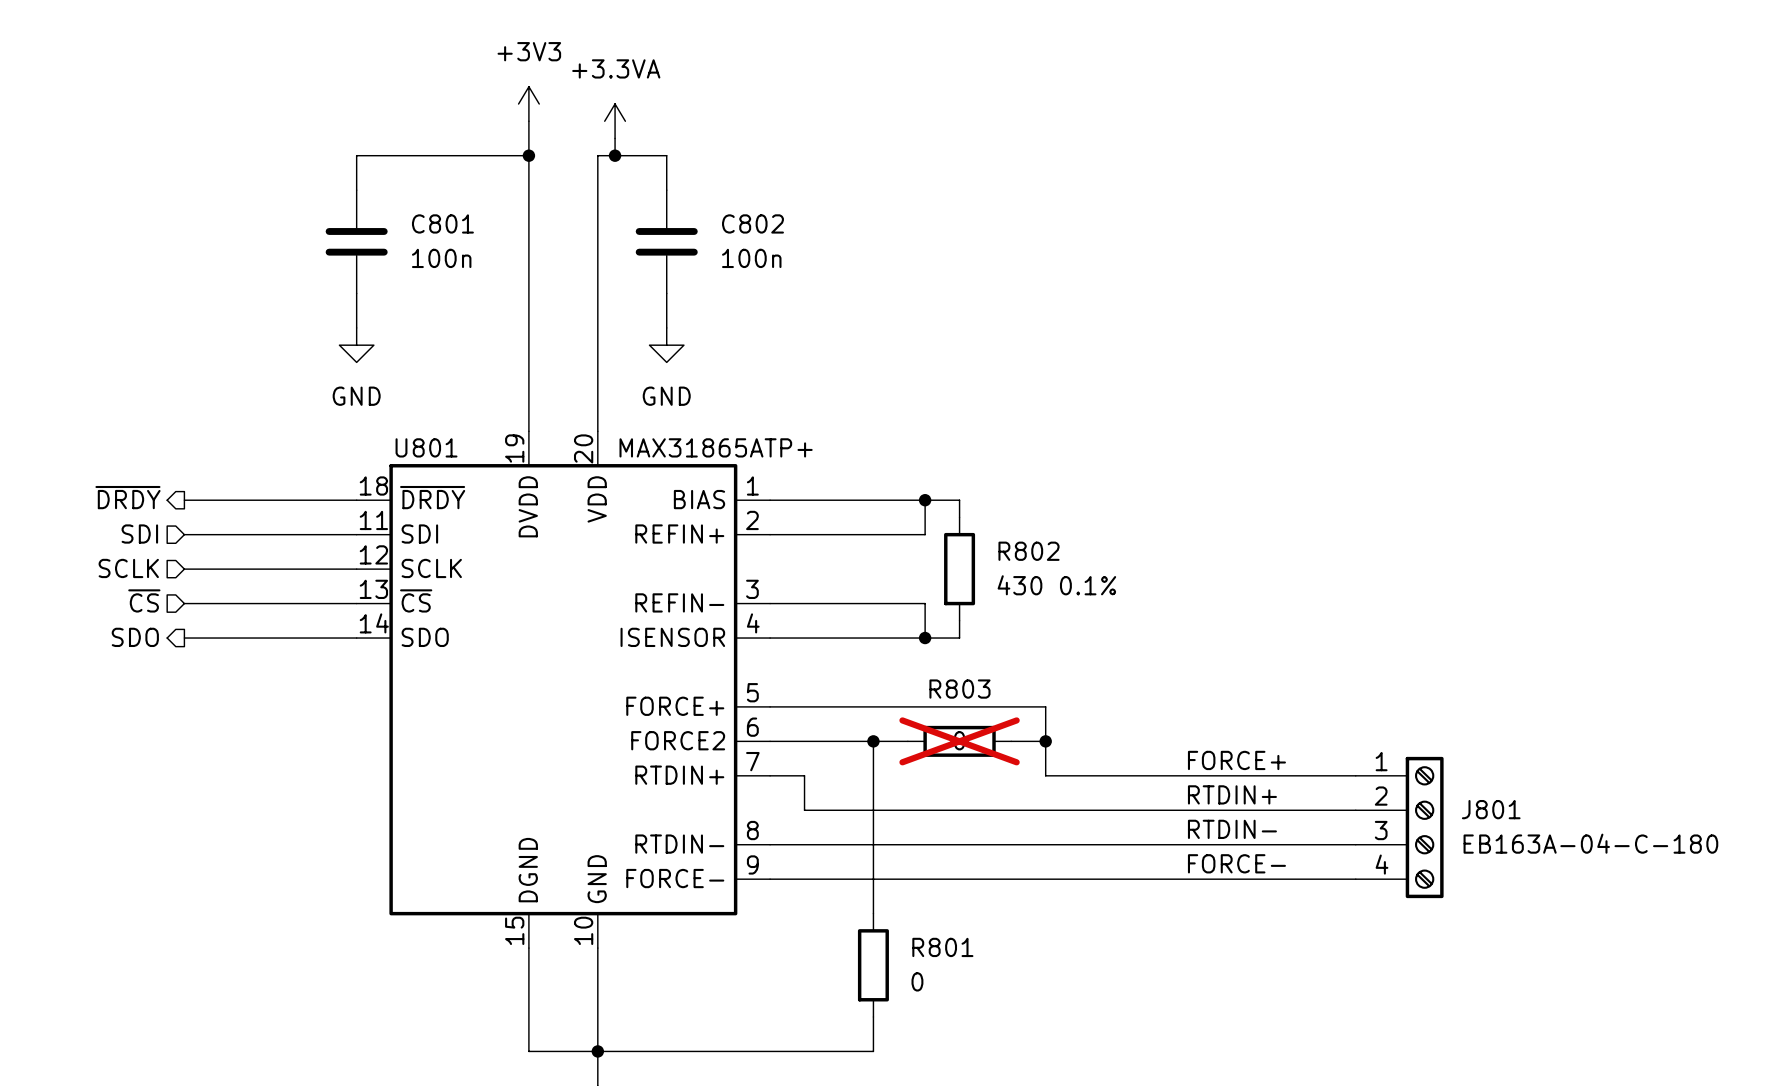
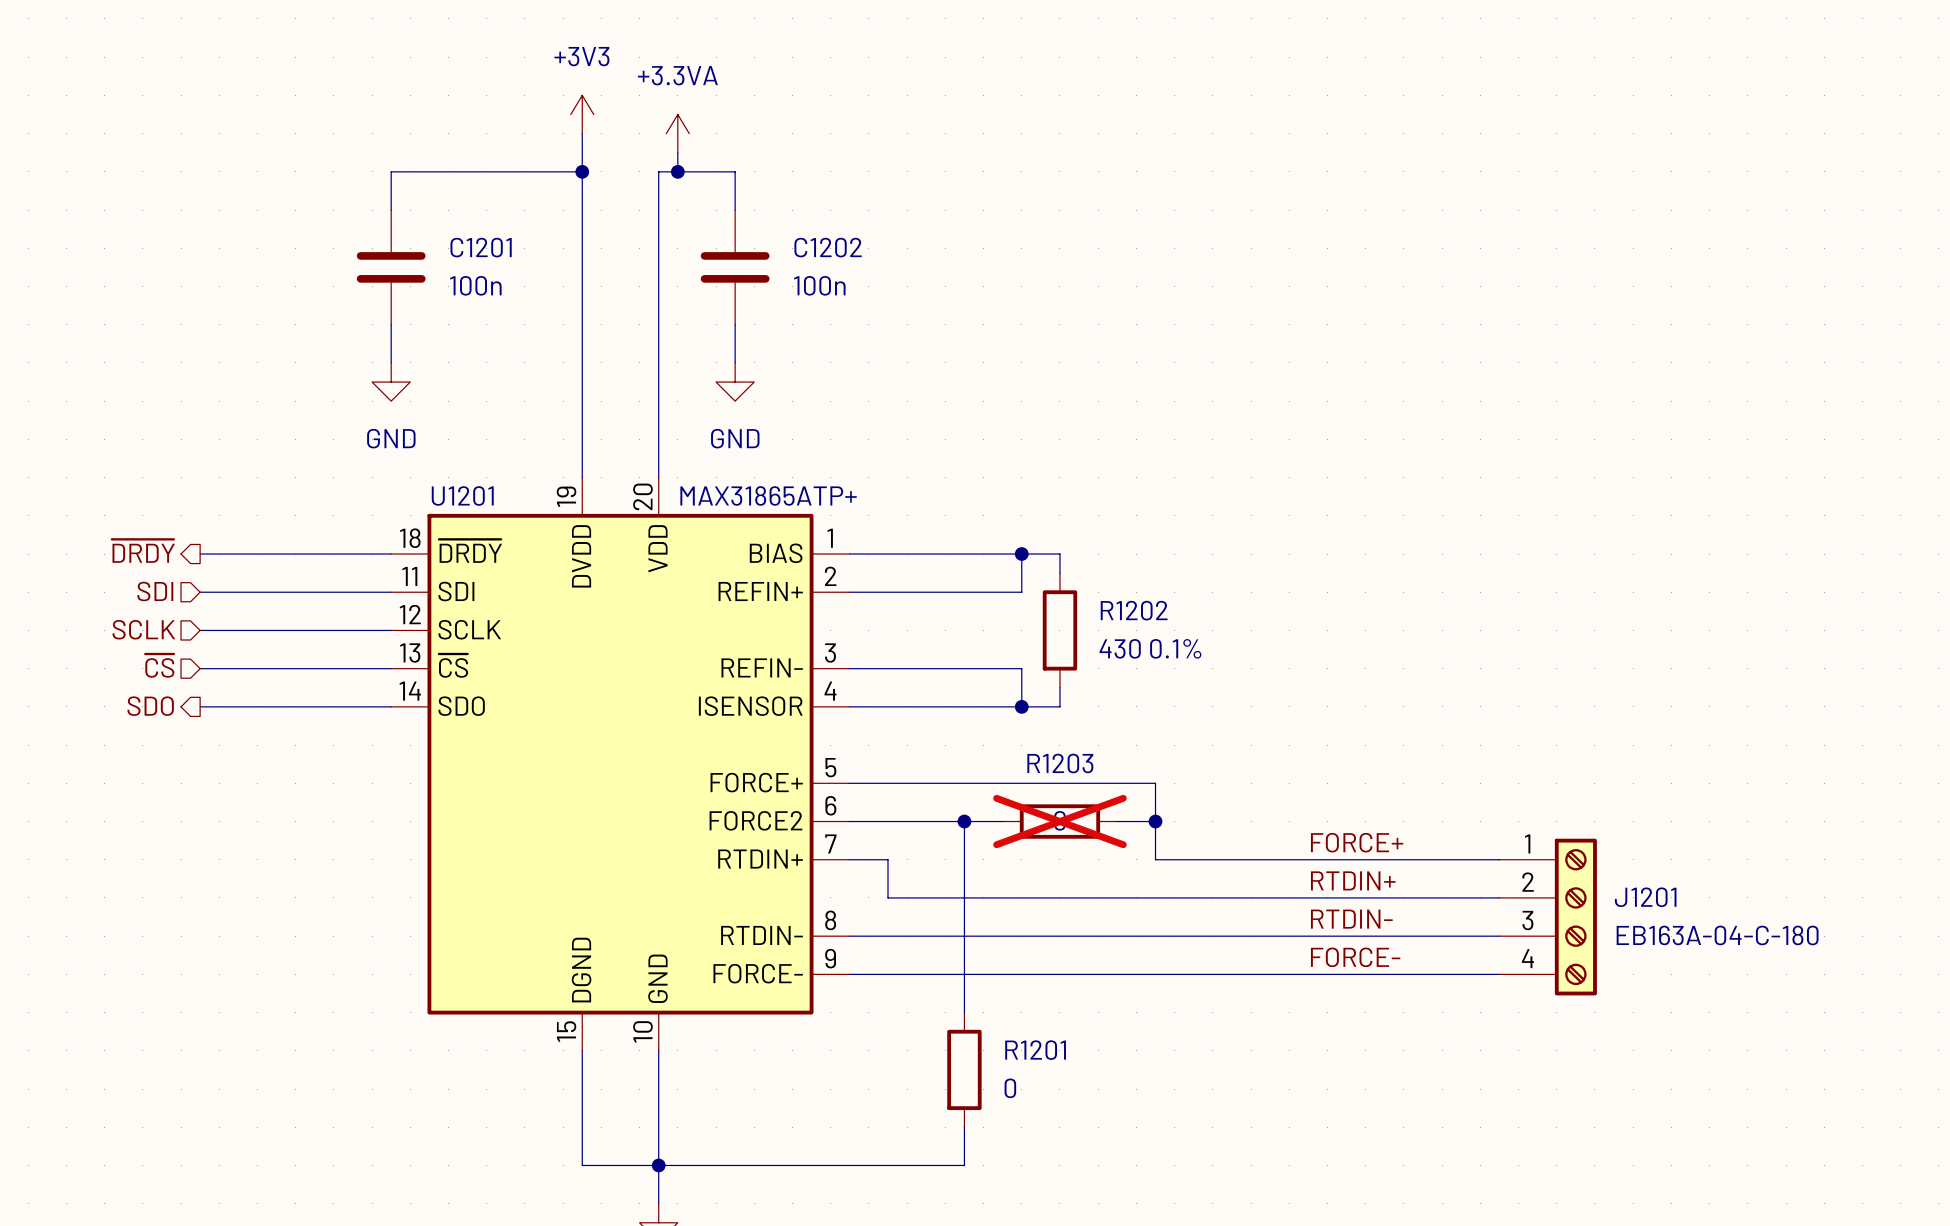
C801 name: C801 (442, 223) -> C1201 (481, 247)
C802 name: C802 (752, 223) -> C1202 (828, 247)
U801 name: U801 (426, 447) -> U1201 (462, 495)
R802 name: R802 (1029, 551) -> R1202 (1134, 610)
R803 name: R803 (959, 689) -> R1203 (1060, 763)
J801 name: J801 (1491, 809) -> J1201 (1645, 897)
R801 name: R801 (942, 947) -> R1201 (1035, 1050)

